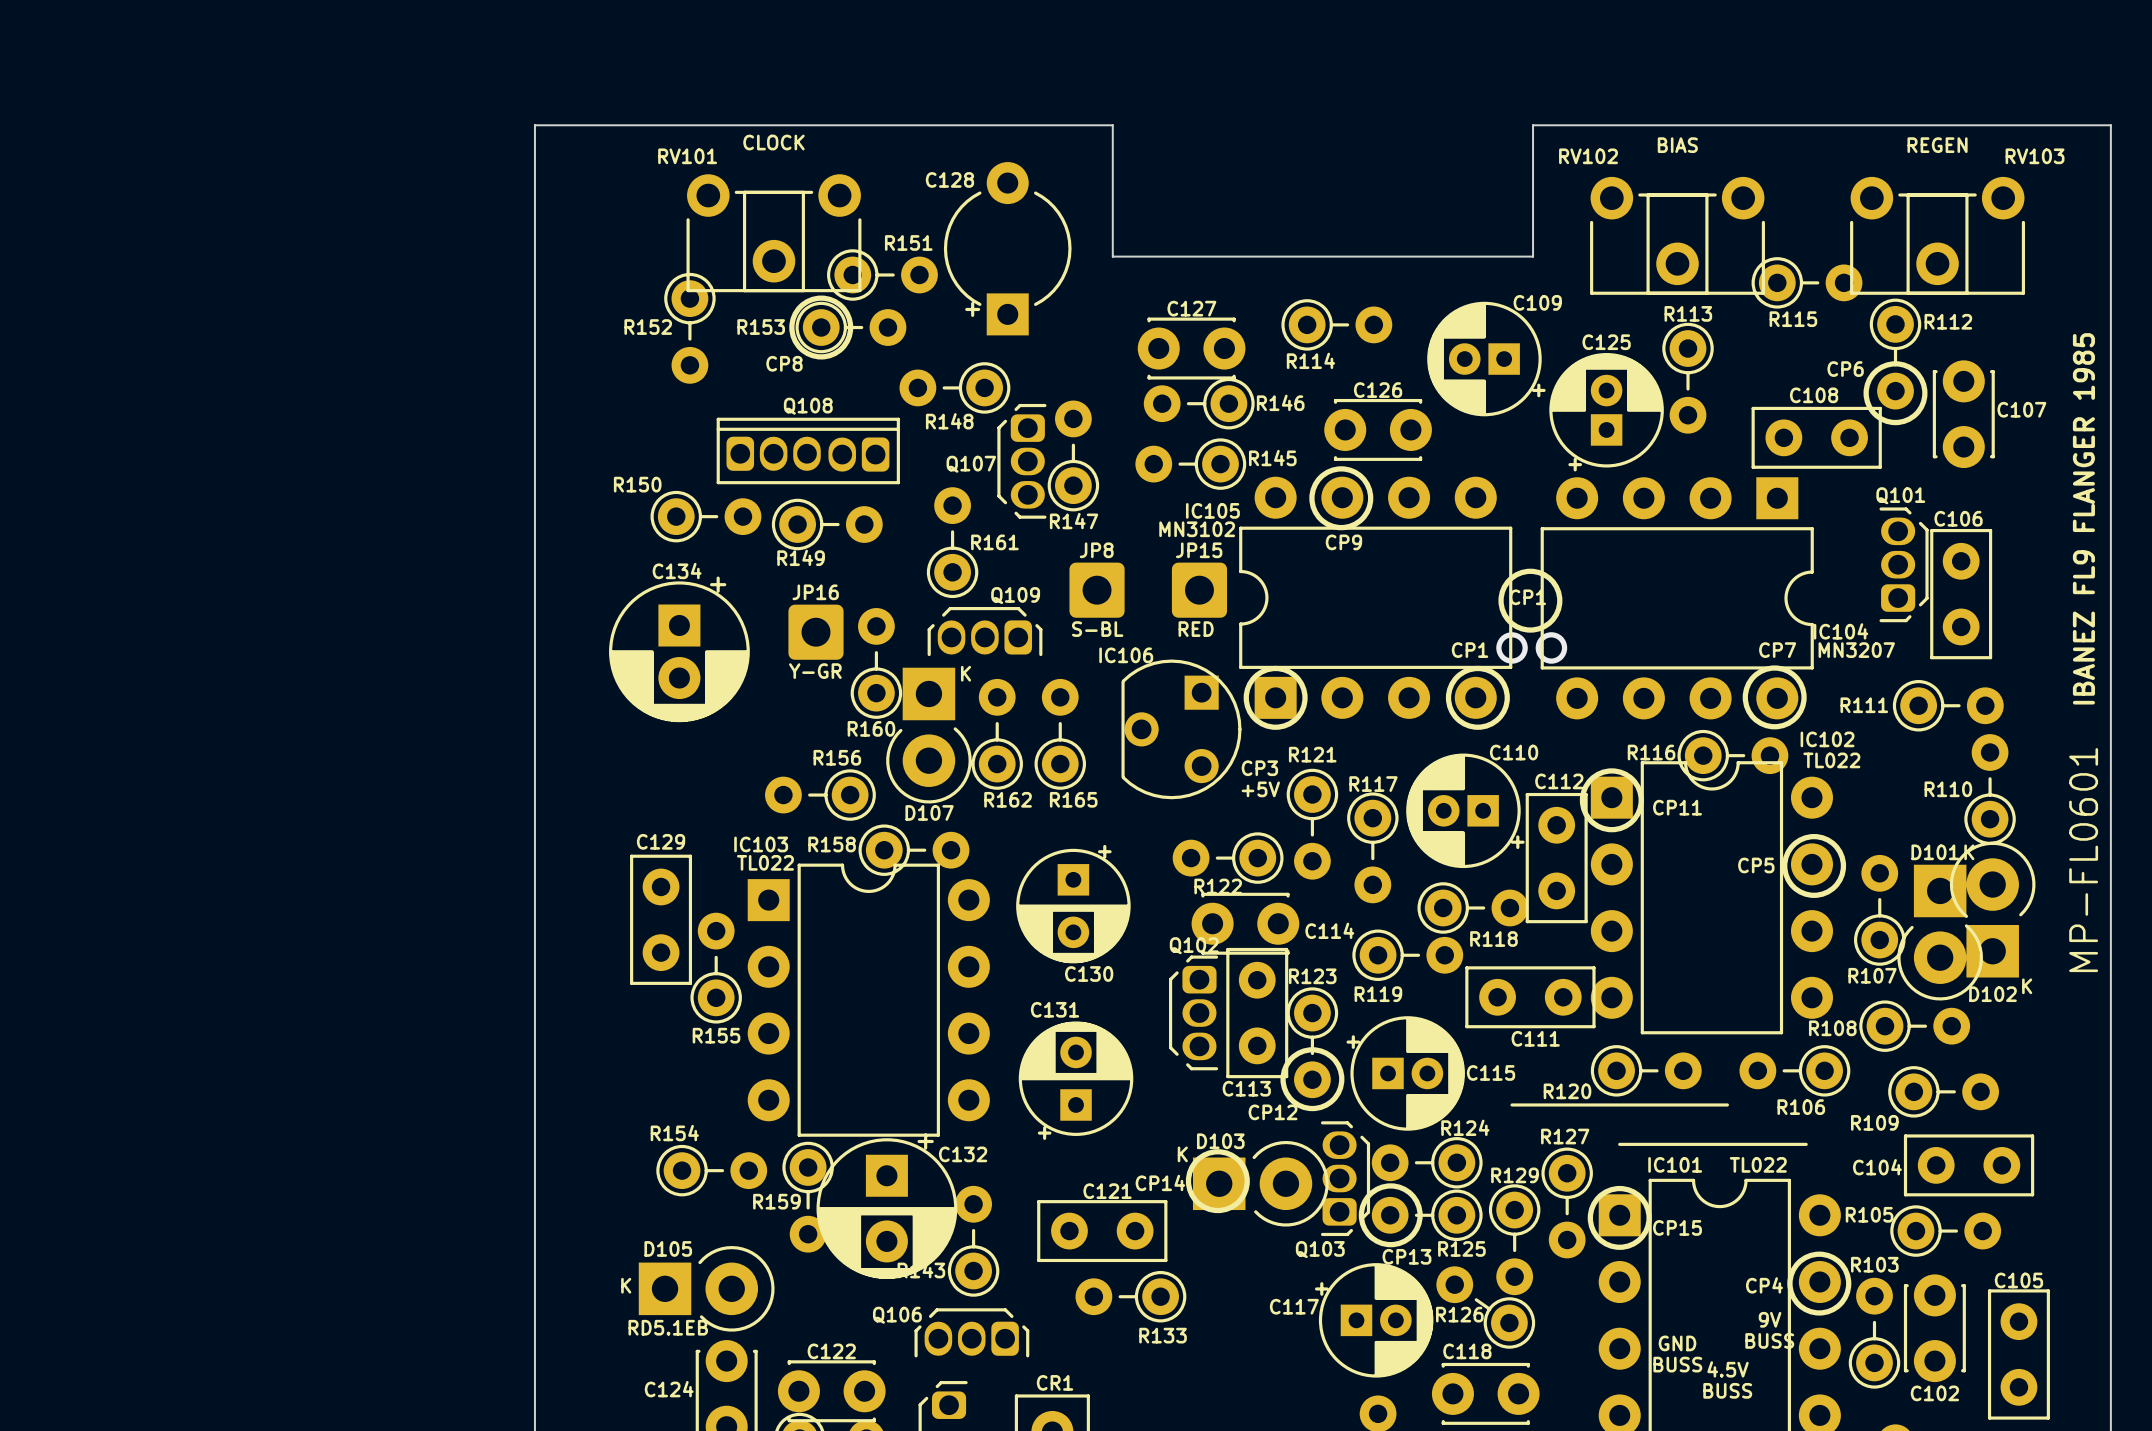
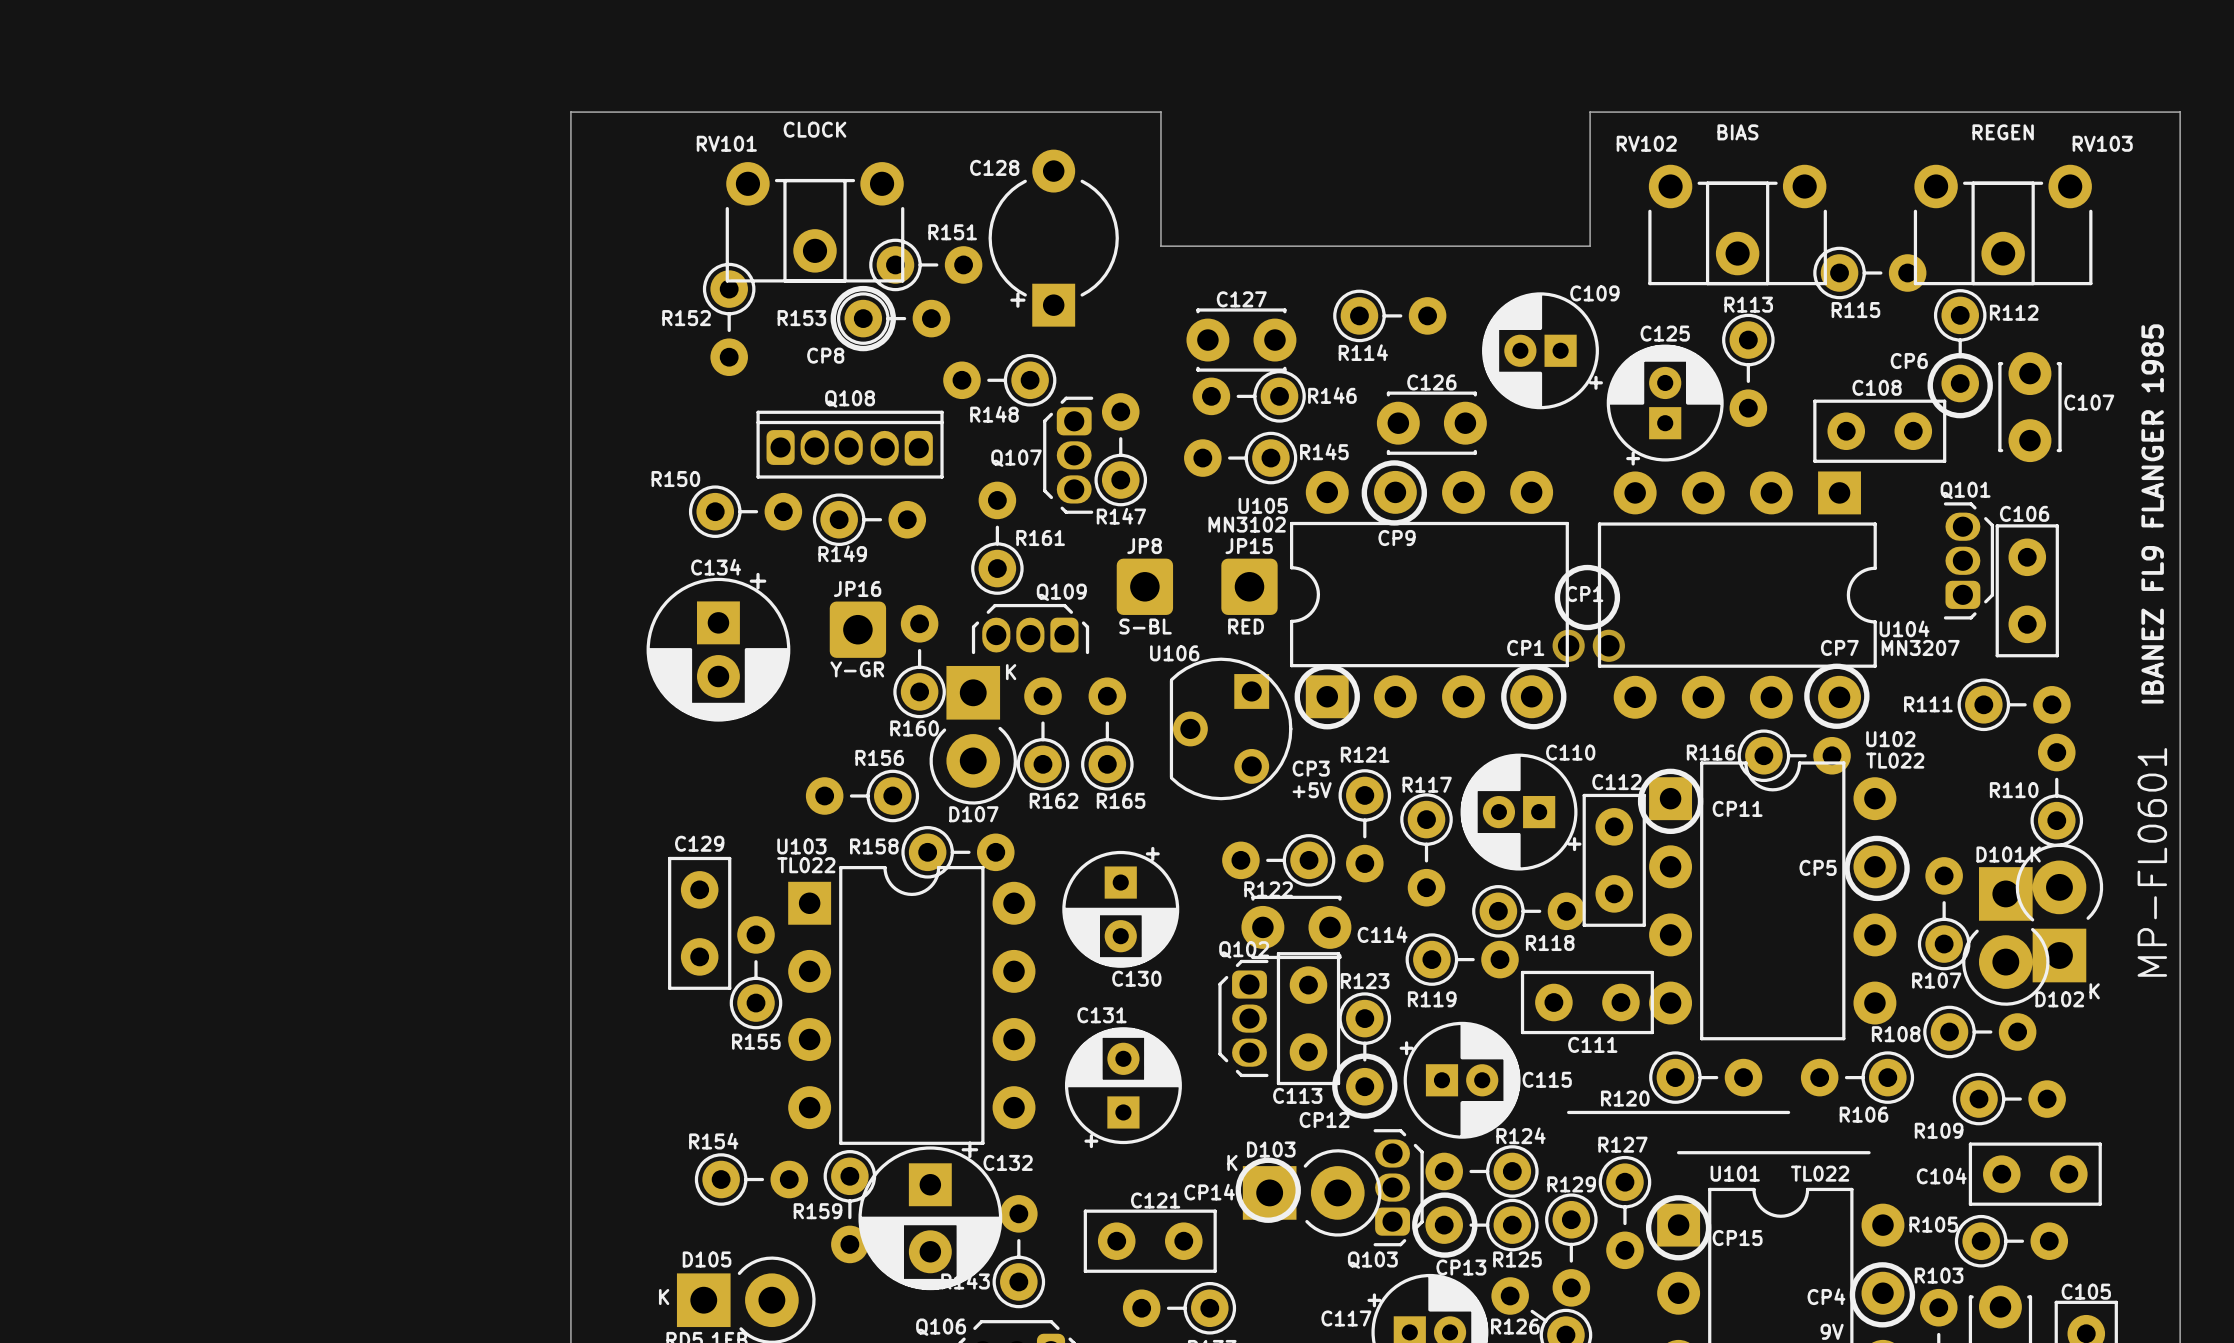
IC105 name: IC105 (1212, 510) -> U105 (1263, 505)
IC104 name: IC104 (1840, 631) -> U104 (1904, 628)
IC106 name: IC106 (1126, 655) -> U106 (1174, 653)
IC102 name: IC102 (1827, 739) -> U102 (1890, 739)
IC103 name: IC103 (761, 844) -> U103 (801, 846)
IC101 name: IC101 (1675, 1164) -> U101 (1735, 1173)

